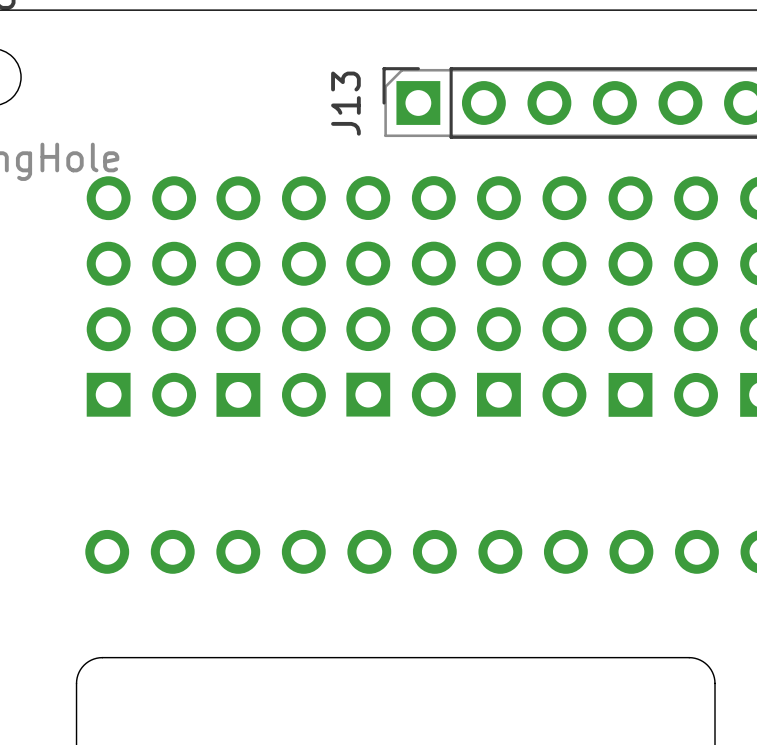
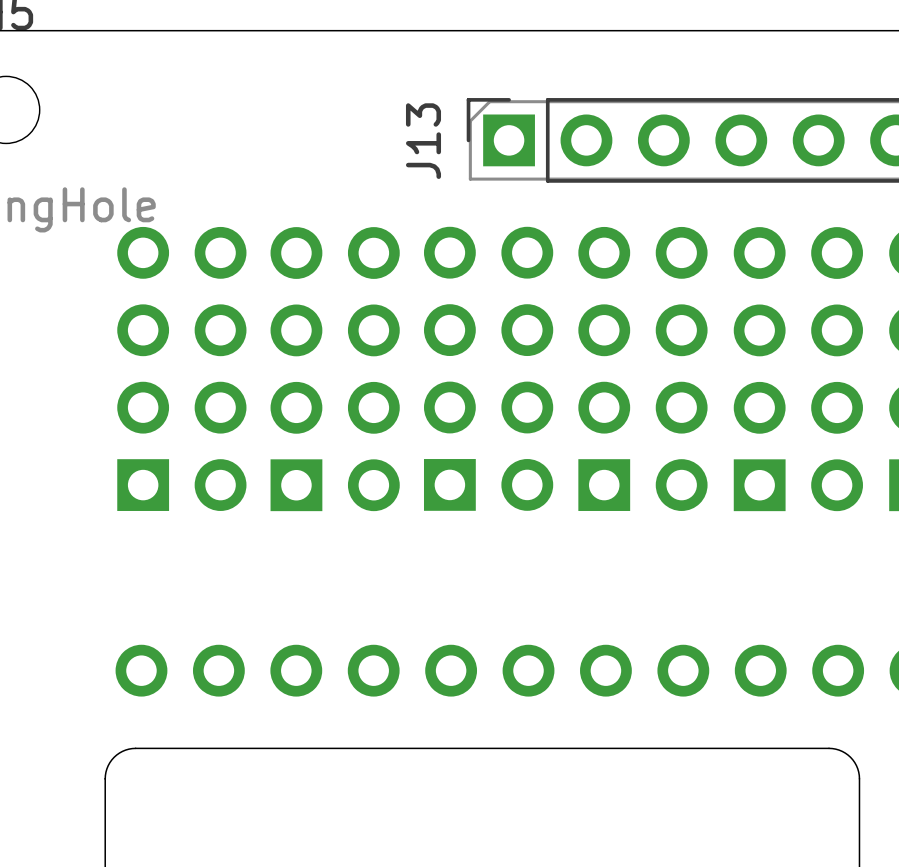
board edge: (76, 683) (79, 672) (84, 665) (91, 660) (102, 657) (689, 657) (697, 659) (707, 665) (713, 674) (715, 683) -> (105, 826) (106, 768) (111, 759) (119, 753) (135, 748) (832, 748) (848, 755) (857, 768) (859, 826)

